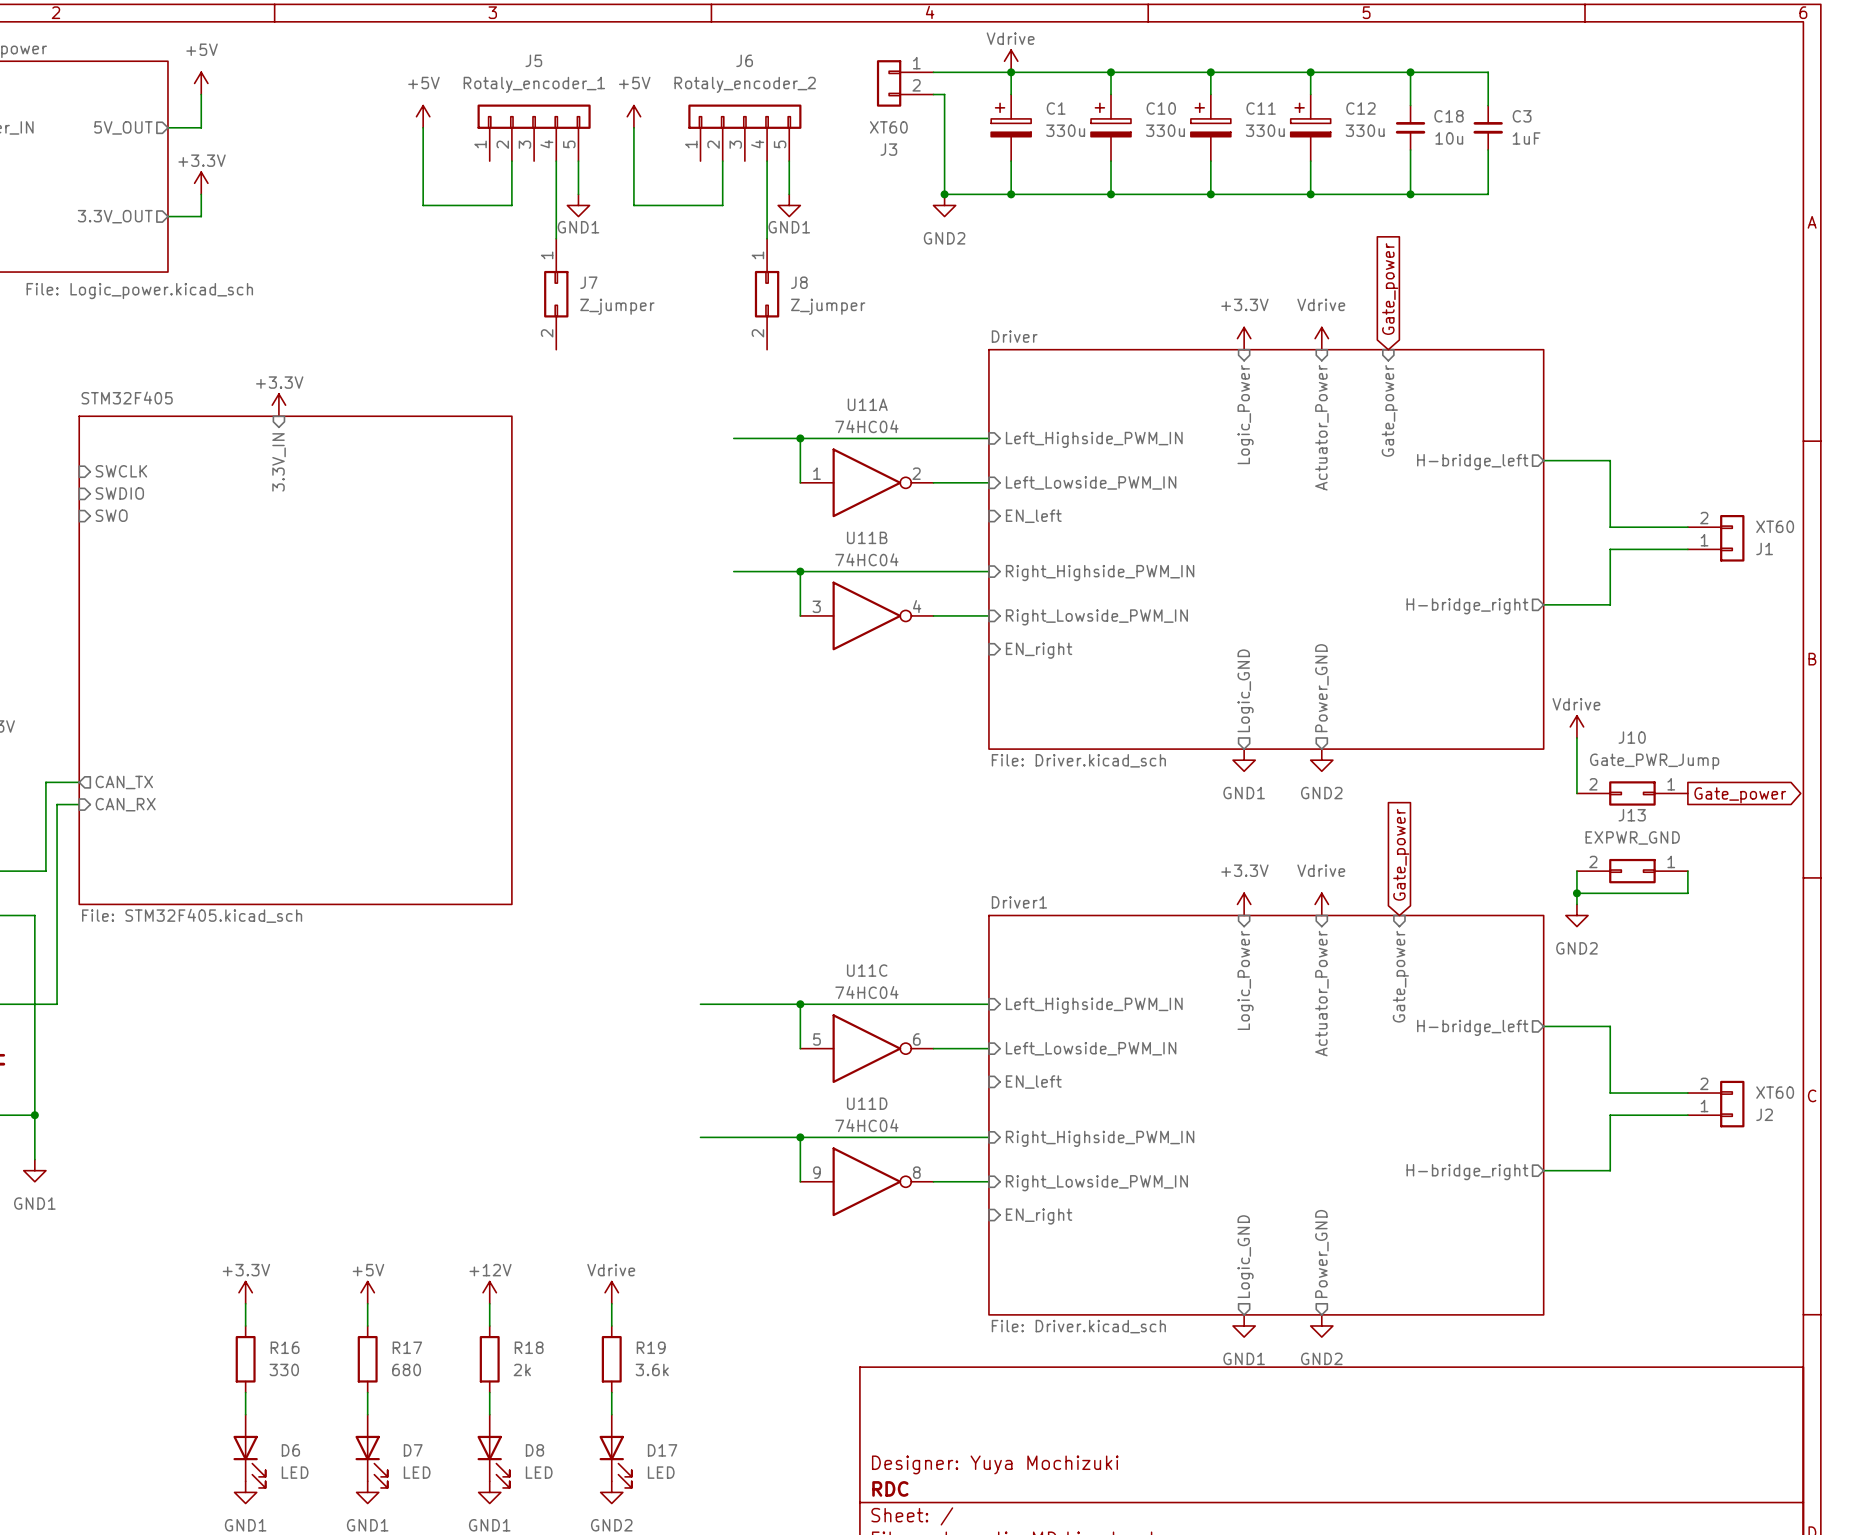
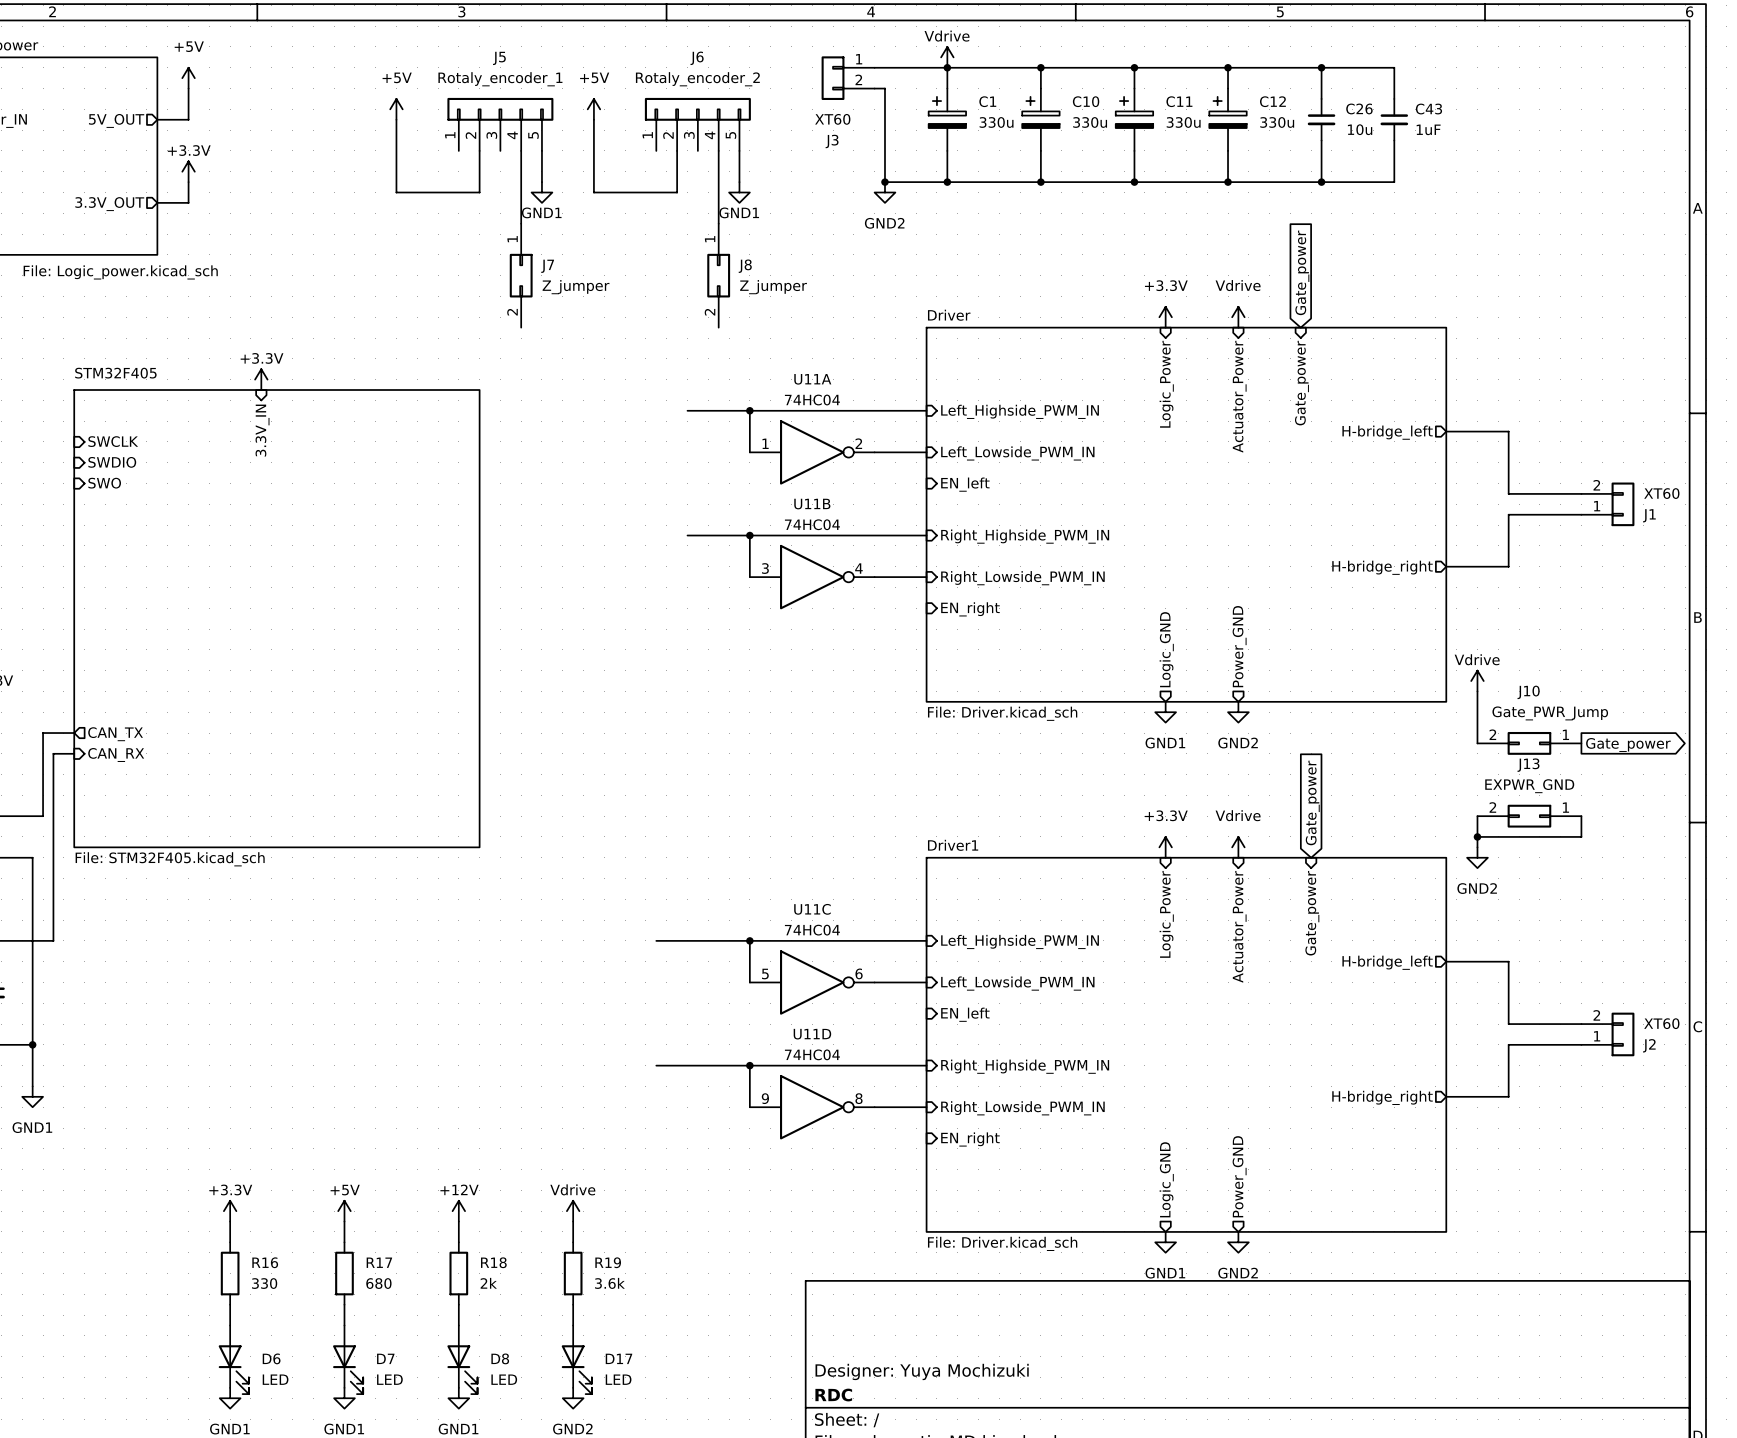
C18 name: C18 (1449, 116) -> C26 (1359, 108)
C3 name: C3 (1522, 116) -> C43 (1428, 109)

